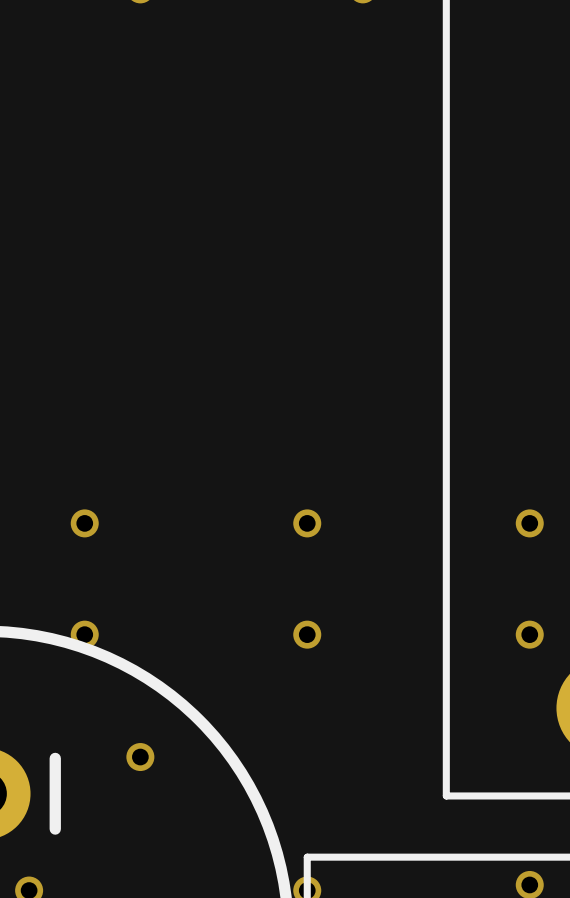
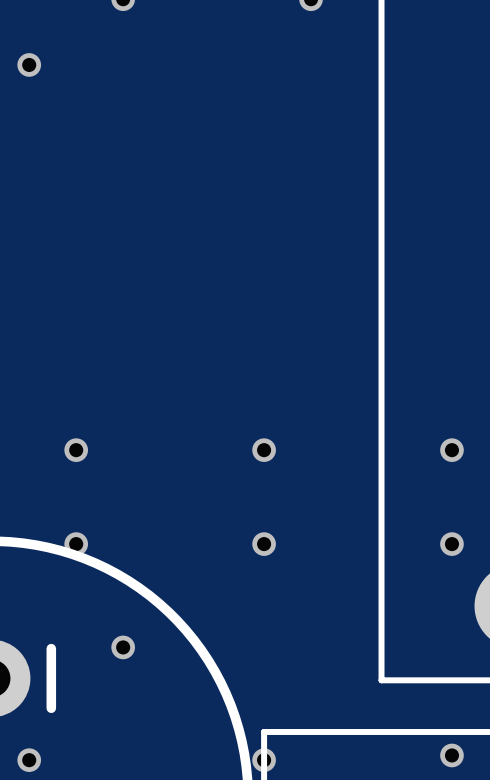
via: none -> (29, 64)

